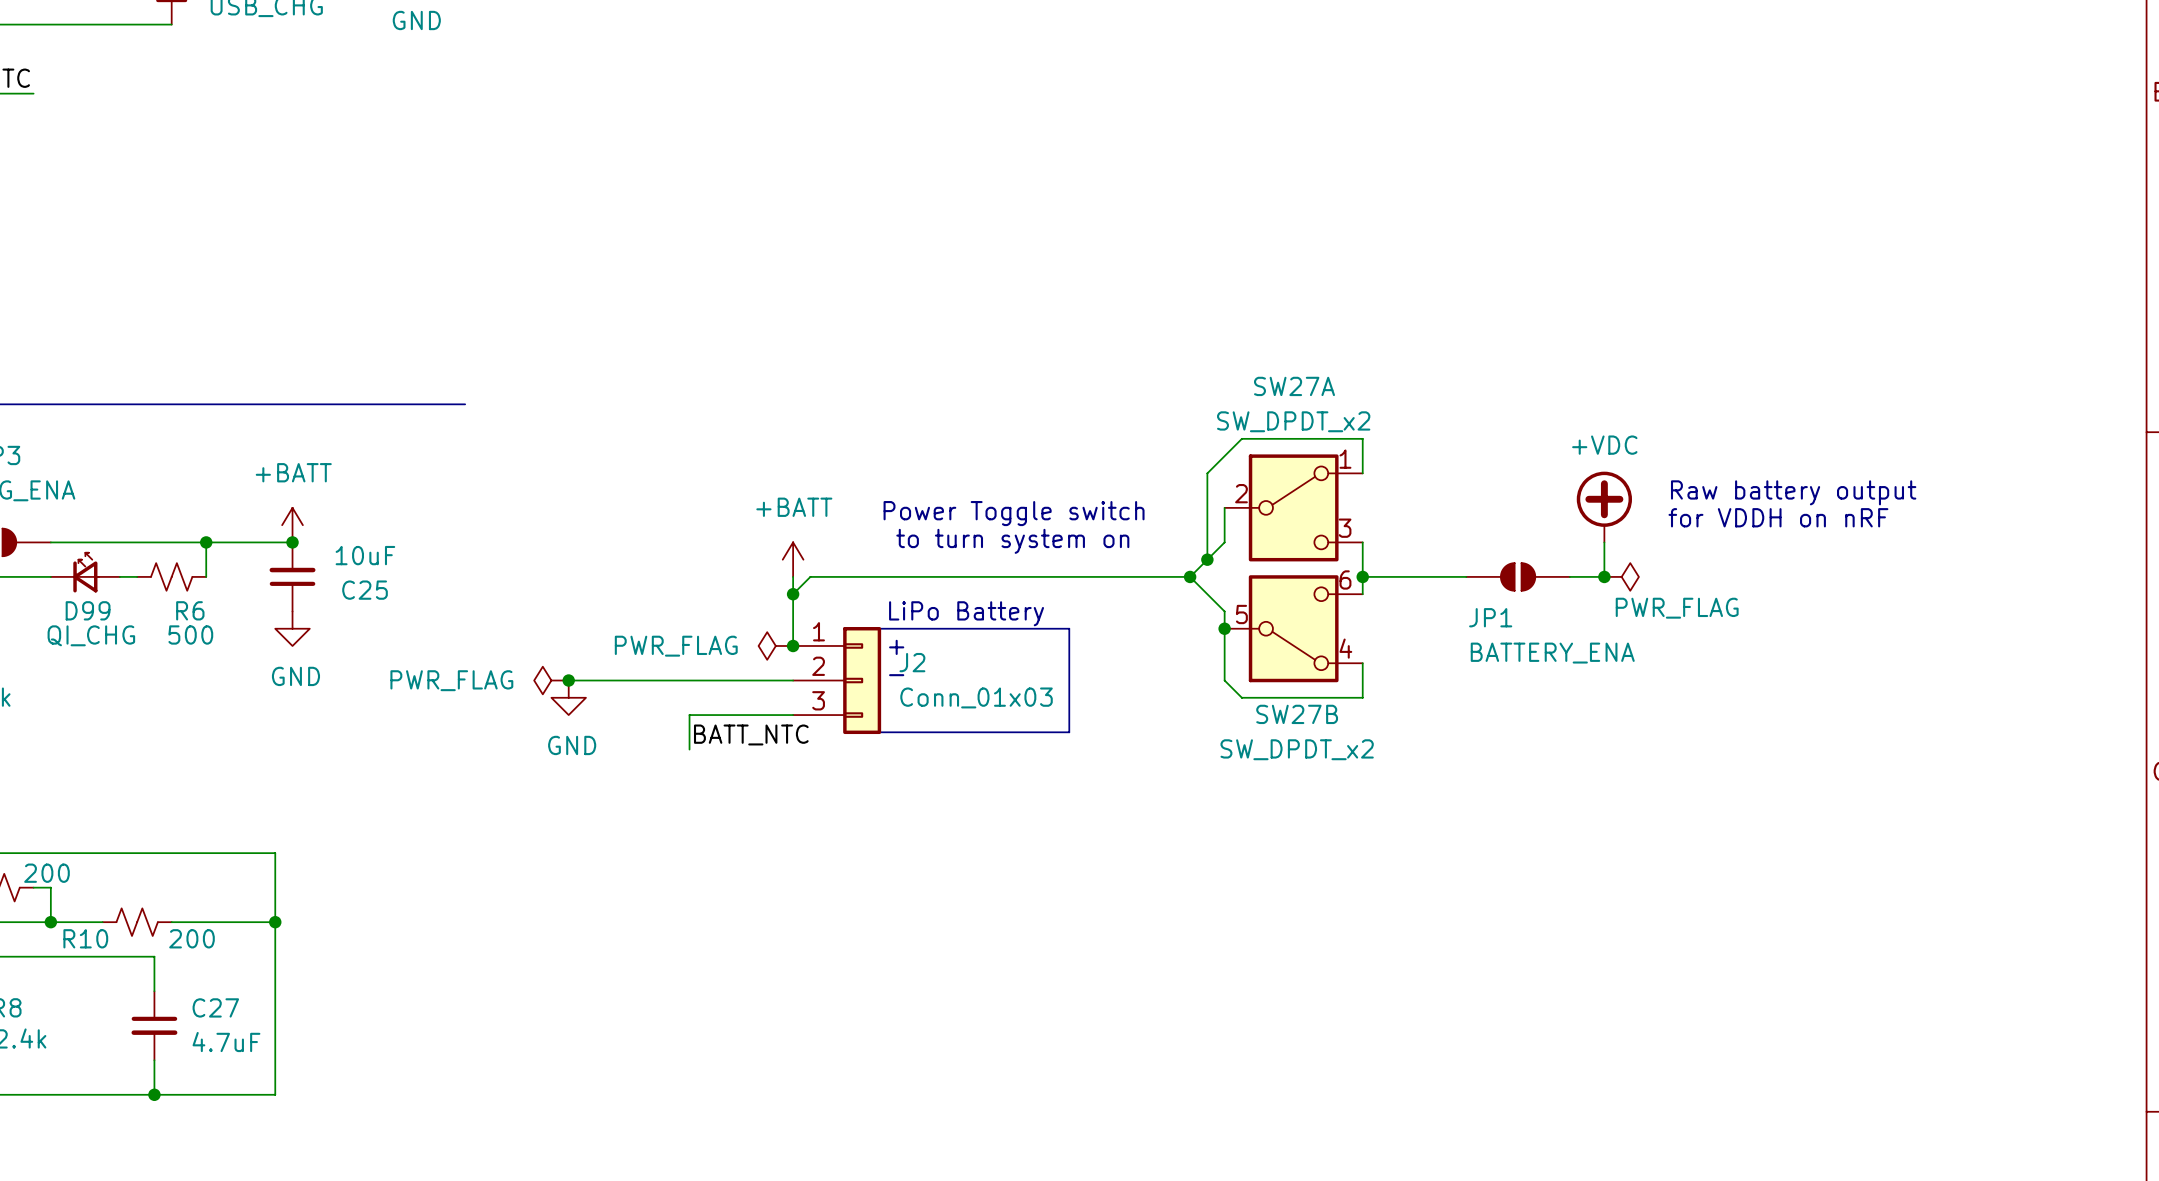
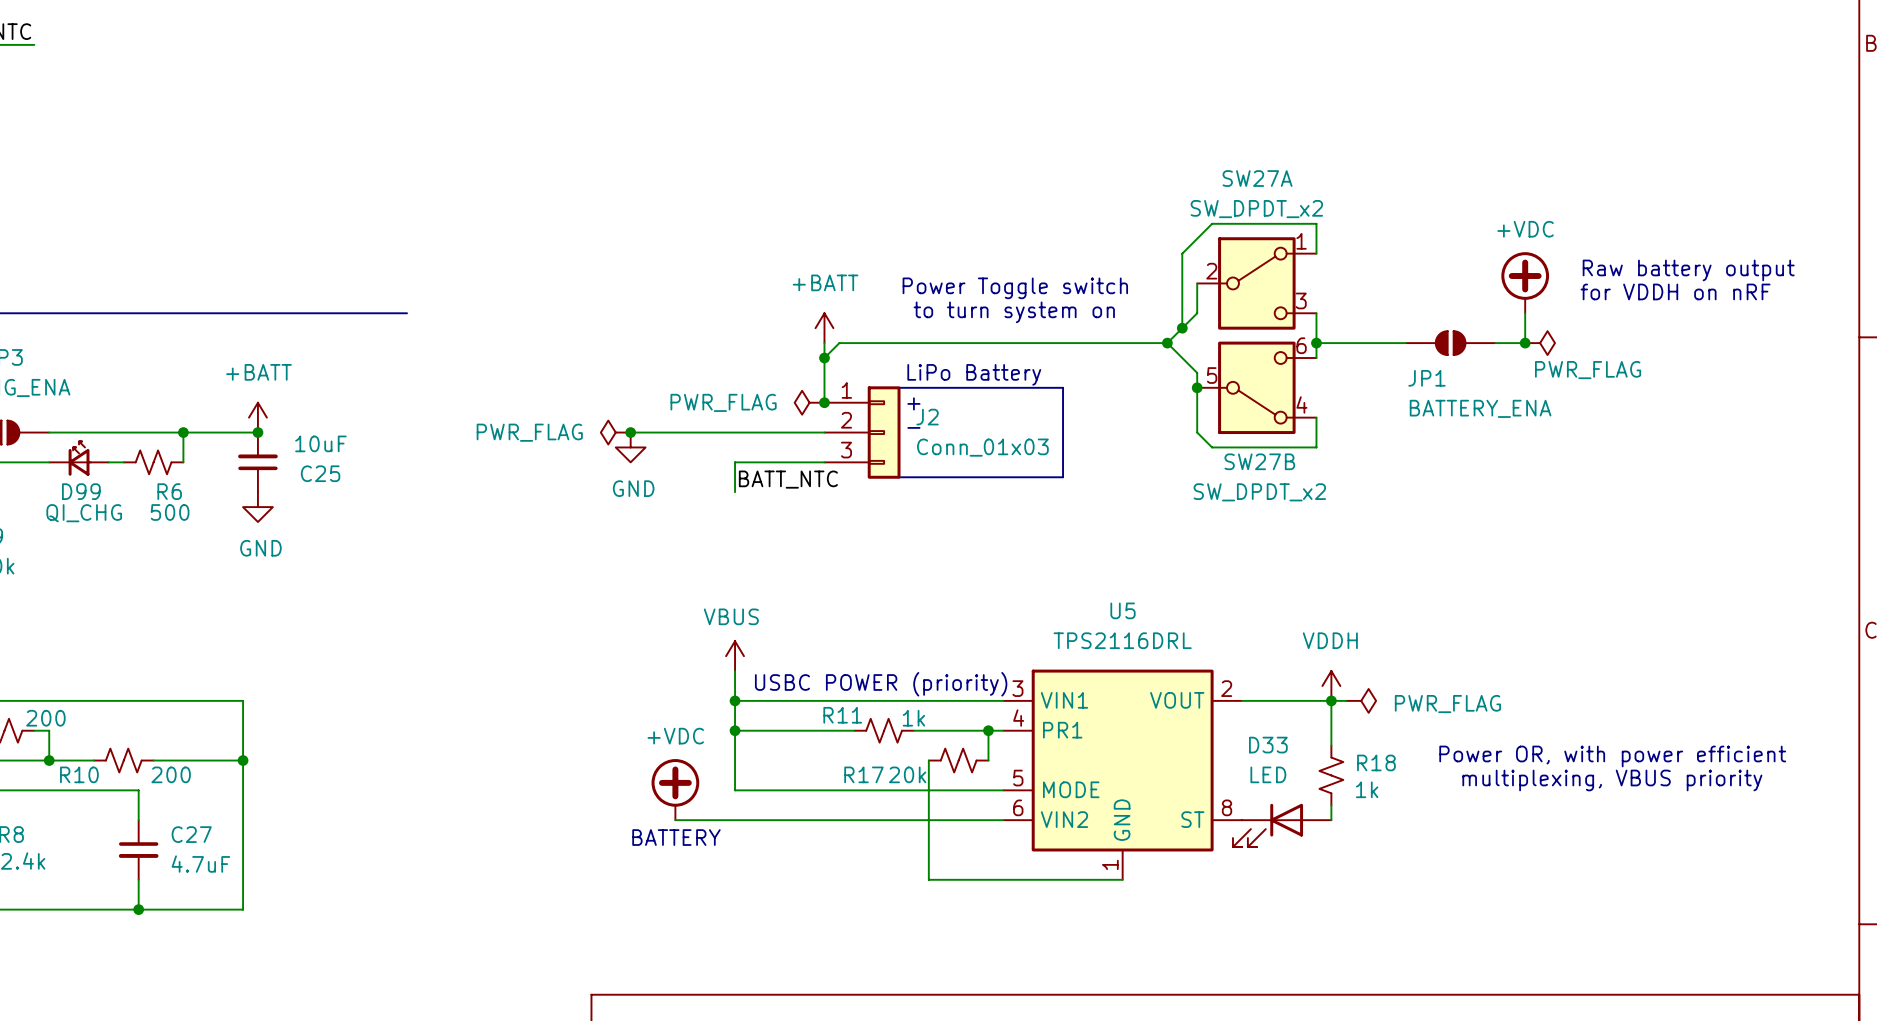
wire: none -> (1316, 253) (1316, 223) (1212, 223) (1182, 253) (1182, 328)
wire: none -> (1197, 283) (1197, 313) (1167, 343) (1197, 372) (1197, 432) (1212, 447) (1316, 447) (1316, 417)
junction: none -> (1182, 328)
wire: (1241, 438) (1207, 473) (1207, 559) -> (1077, 343) (839, 343) (824, 358)
wire: (1345, 438) (1362, 438) (1362, 473) -> none
junction: none -> (1167, 343)
junction: none -> (1316, 343)
junction: none -> (1525, 343)
power symbol: none -> PWR_FLAG (1540, 343)
junction: none -> (824, 358)
junction: none -> (1197, 387)
text position: Raw battery output (1793, 492) -> Raw battery output (1688, 270)
power symbol: none -> PWR_FLAG (809, 402)
junction: none -> (824, 402)
wire: (1224, 507) (1224, 542) (1190, 576) -> none
SW27A position: (1293, 507) -> (1256, 283)
power symbol position: +VDC (1604, 507) -> +VDC (1525, 282)
text position: Power Toggle switch (1014, 513) -> Power Toggle switch (1015, 288)
text position: for VDDH on nRF (1778, 517) -> for VDDH on nRF (1675, 291)
text position: to turn system on (1012, 541) -> to turn system on (1014, 312)
power symbol: none -> PWR_FLAG (615, 432)
junction: none -> (630, 432)
wire: (1362, 542) (1362, 594) -> (1316, 313) (1316, 358)
wire: (1604, 542) (1604, 576) (1569, 576) -> (1525, 313) (1525, 343) (1495, 343)
power symbol position: +BATT (793, 559) -> +BATT (824, 328)
junction: (1207, 559) -> none
wire: (793, 576) (793, 645) -> (824, 343) (824, 402)
wire: (844, 576) (810, 576) (793, 594) -> (735, 462) (735, 492)
wire: (948, 576) (1190, 576) -> none
wire: (1190, 576) (1224, 611) (1224, 680) (1241, 697) (1362, 697) (1362, 663) -> none
junction: (1190, 576) -> none
wire: (1362, 576) (1466, 576) -> (1316, 343) (1405, 343)
junction: (1362, 576) -> none
JP1 position: (1518, 576) -> (1450, 343)
junction: (1604, 576) -> none
power symbol: PWR_FLAG (1621, 576) -> none
junction: (793, 594) -> none
text position: LiPo Battery (966, 613) -> LiPo Battery (974, 374)
line: (879, 628) (879, 732) (1069, 732) (1069, 628) (879, 628) -> (899, 387) (899, 477) (1063, 477) (1063, 387) (899, 387)
junction: (1224, 628) -> none
SW27B position: (1293, 628) -> (1256, 387)
power symbol: PWR_FLAG (775, 645) -> none
junction: (793, 645) -> none
text position: + (896, 647) -> + (913, 403)
text position: - (896, 675) -> - (913, 427)
power symbol: PWR_FLAG (551, 680) -> none
wire: (568, 680) (793, 680) -> (630, 432) (824, 432)
junction: (568, 680) -> none
J2 position: (837, 680) -> (862, 432)
power symbol position: GND (568, 697) -> GND (630, 447)
wire: (793, 715) (689, 715) (689, 749) -> none
label position: BATT_NTC (751, 734) -> BATT_NTC (788, 479)
power symbol: none -> VBUS (735, 656)
wire: none -> (735, 671) (735, 790) (1003, 790)
text: none -> USBC POWER (priority) (881, 684)
power symbol: none -> VDDH (1331, 685)
wire: none -> (735, 700) (1003, 700)
junction: none -> (735, 700)
wire: none -> (1241, 700) (1346, 700)
wire: none -> (1331, 700) (1331, 745)
junction: none -> (1331, 700)
power symbol: none -> PWR_FLAG (1361, 700)
wire: none -> (735, 730) (854, 730)
junction: none -> (735, 730)
R11: none -> 1k (884, 730)
wire: none -> (913, 730) (1003, 730)
wire: none -> (988, 730) (988, 760)
junction: none -> (988, 730)
text: none -> Power OR, with power efficient (1612, 756)
wire: none -> (928, 760) (928, 879) (1122, 879)
R17: none -> 20k (958, 760)
U5: none -> TPS2116DRL (1122, 774)
R18: none -> 1k (1331, 775)
text: none -> multiplexing, VBUS priority (1612, 780)
power symbol: none -> +VDC (675, 789)
wire: none -> (1331, 805) (1331, 820)
wire: none -> (675, 820) (1003, 820)
D33: none -> LED (1282, 825)
text: none -> BATTERY (676, 837)

